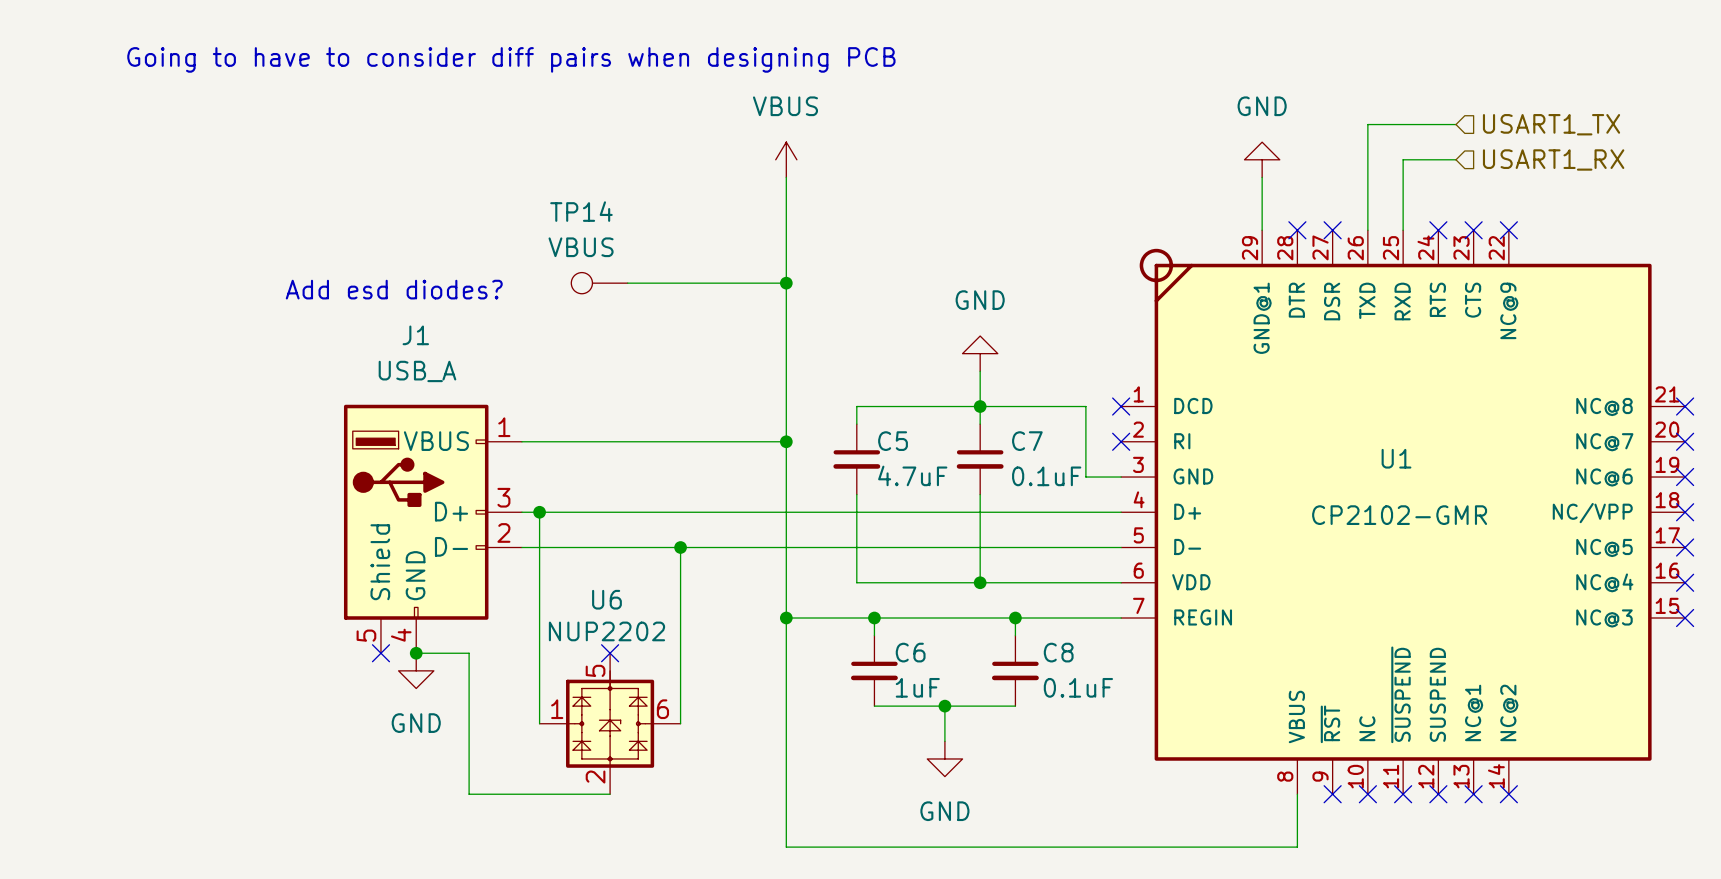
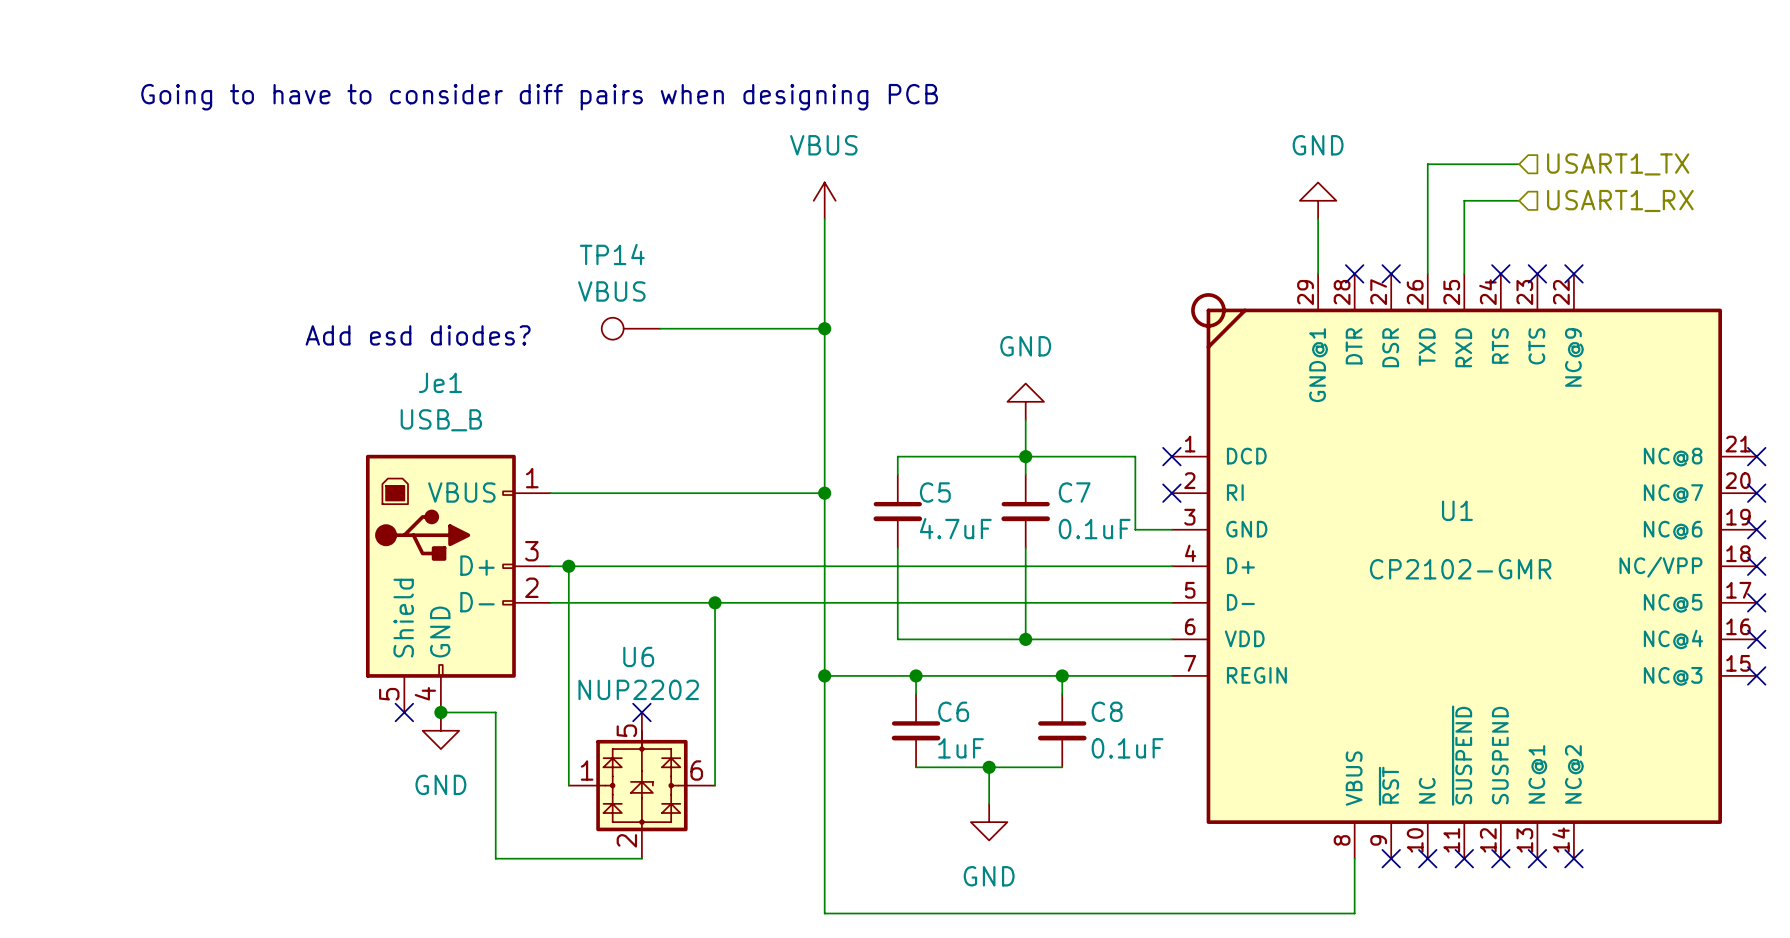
J1: USB_A (432, 529) -> none
Je1: none -> USB_B (458, 583)

